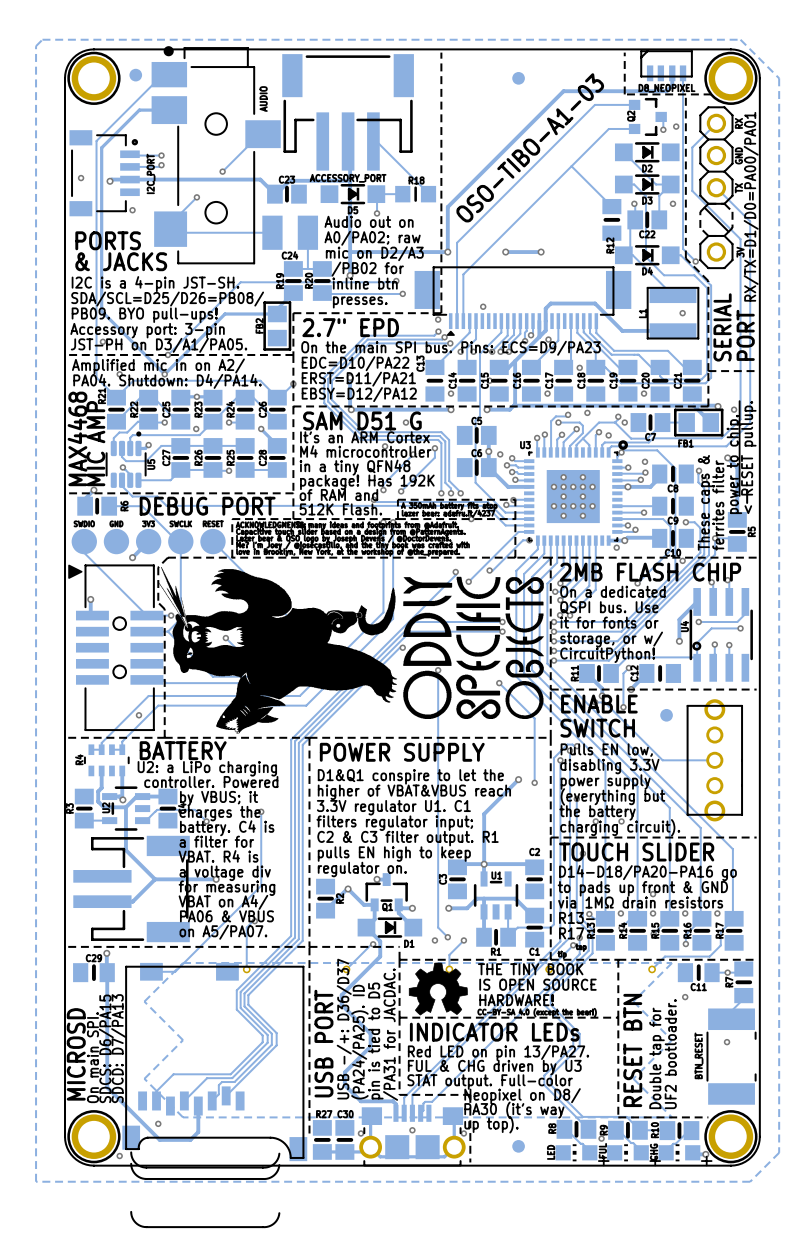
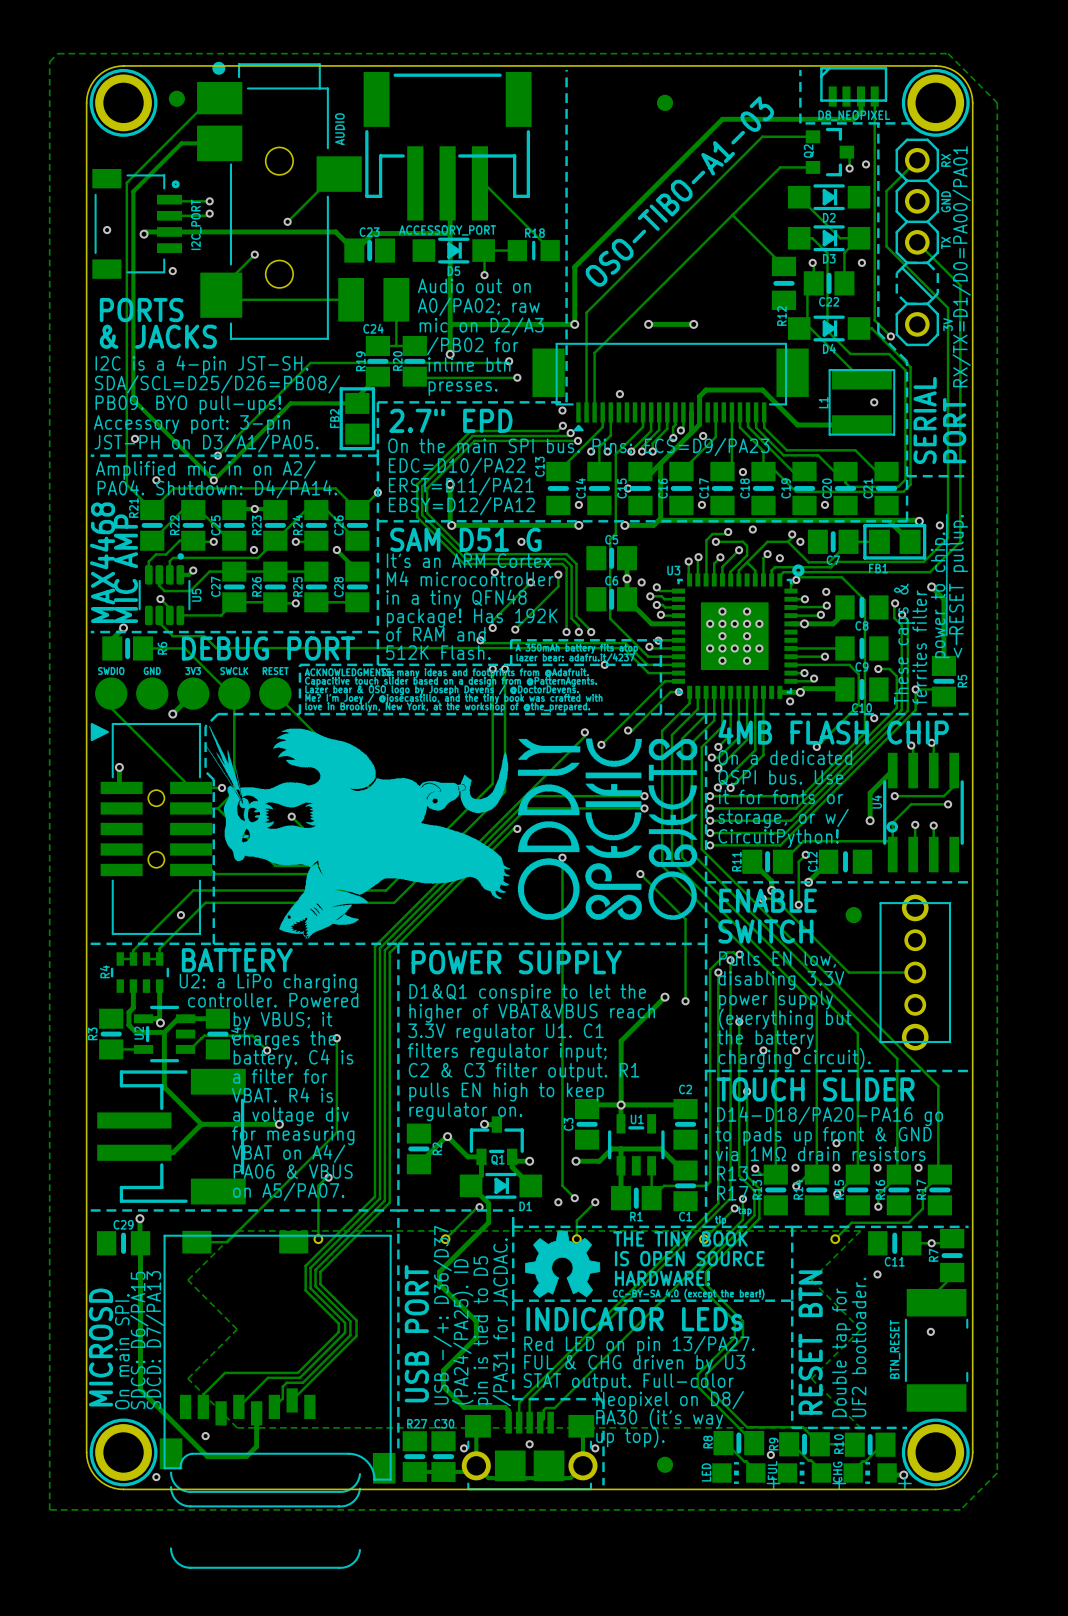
text: 2MB FLASH CHIP (650, 572) -> 4MB FLASH CHIP (833, 732)

